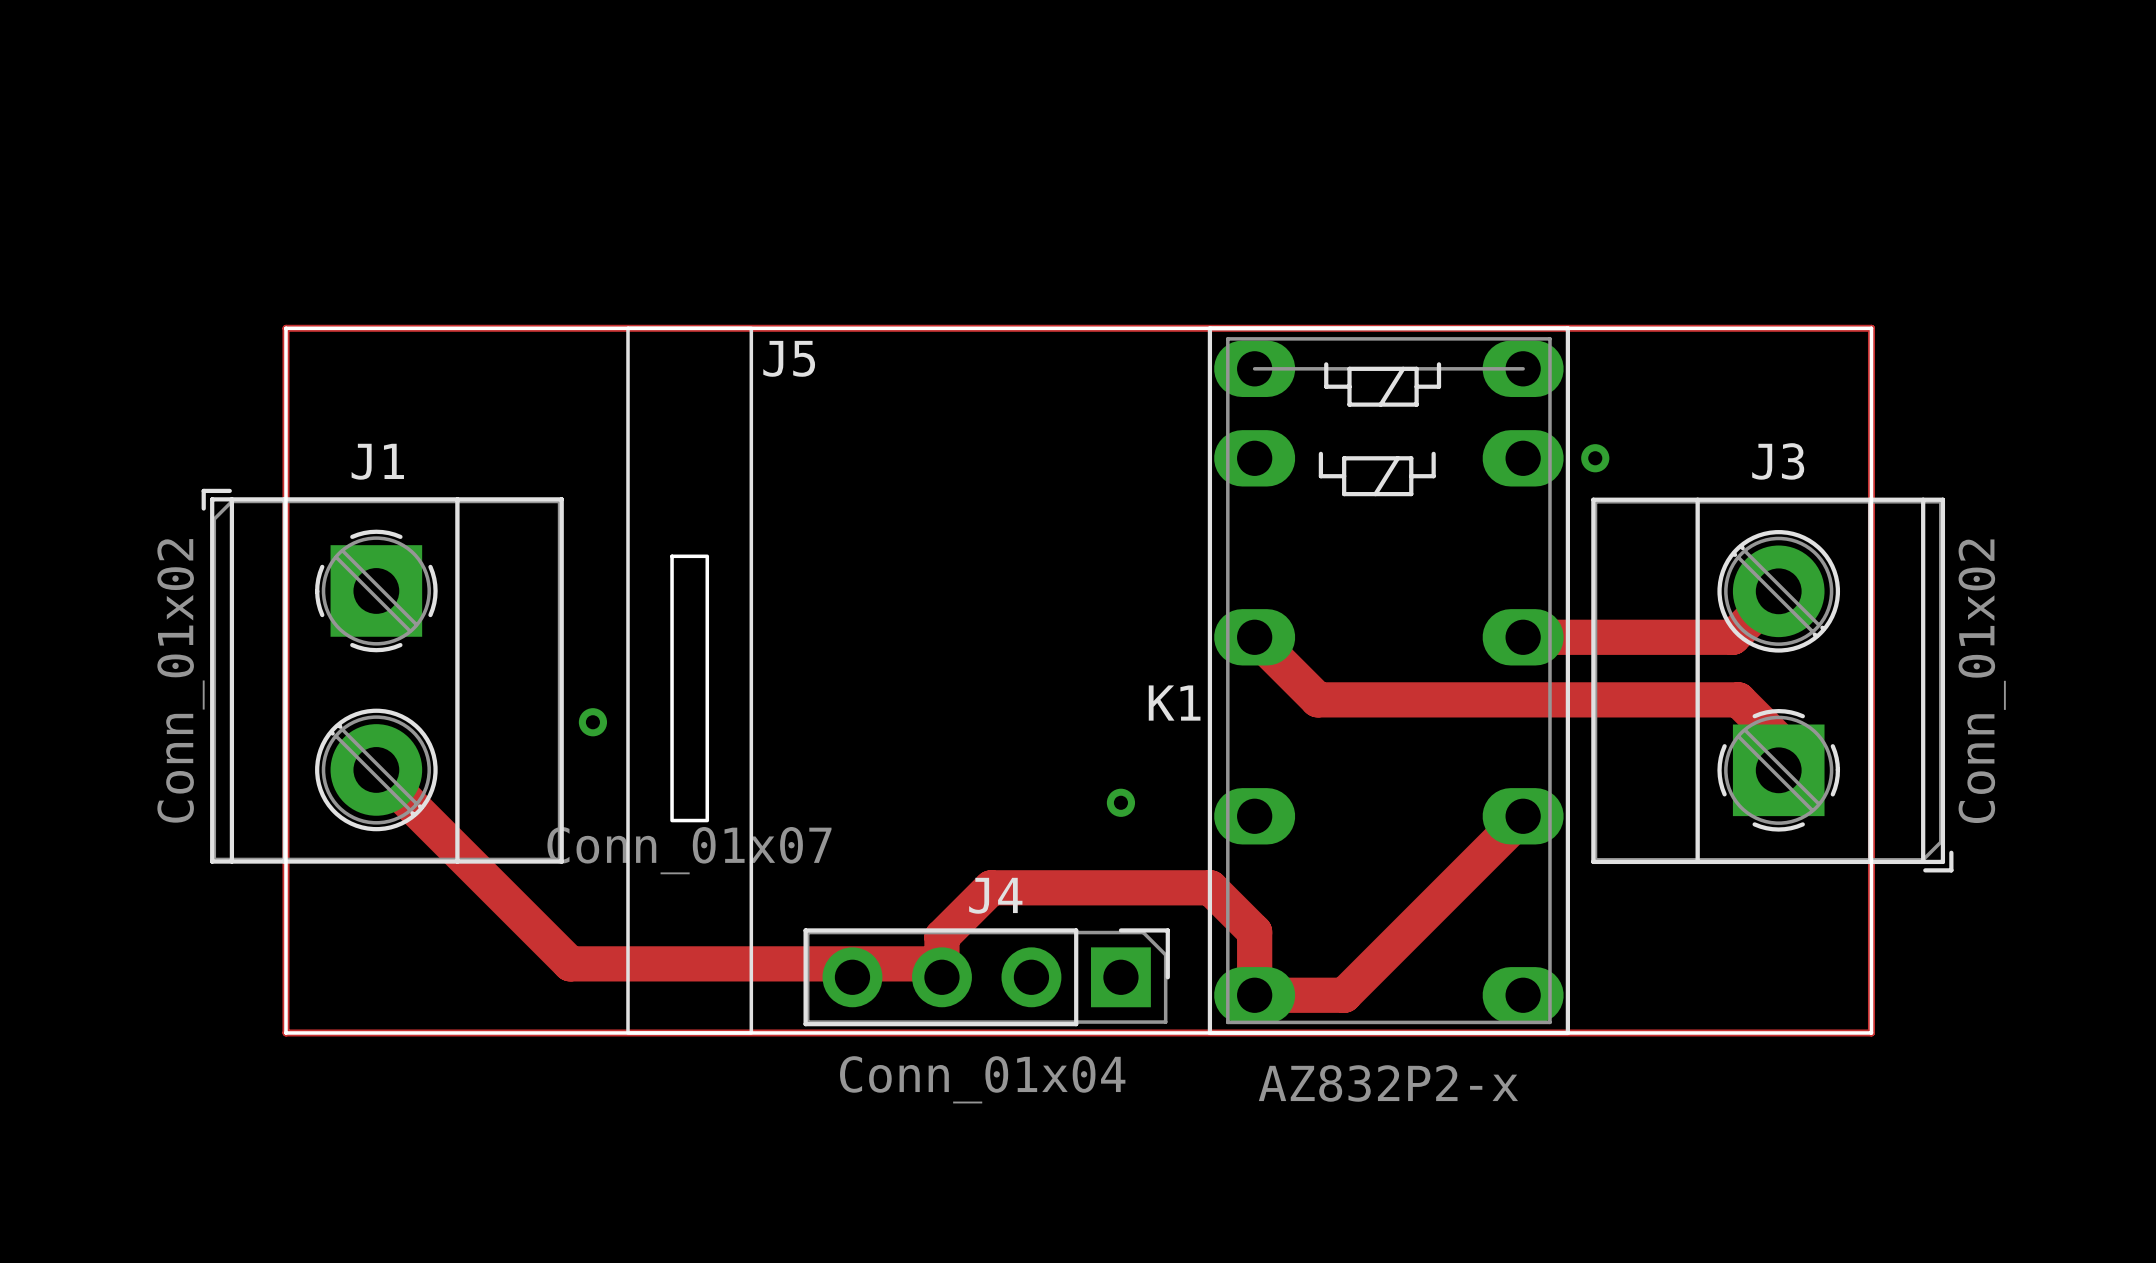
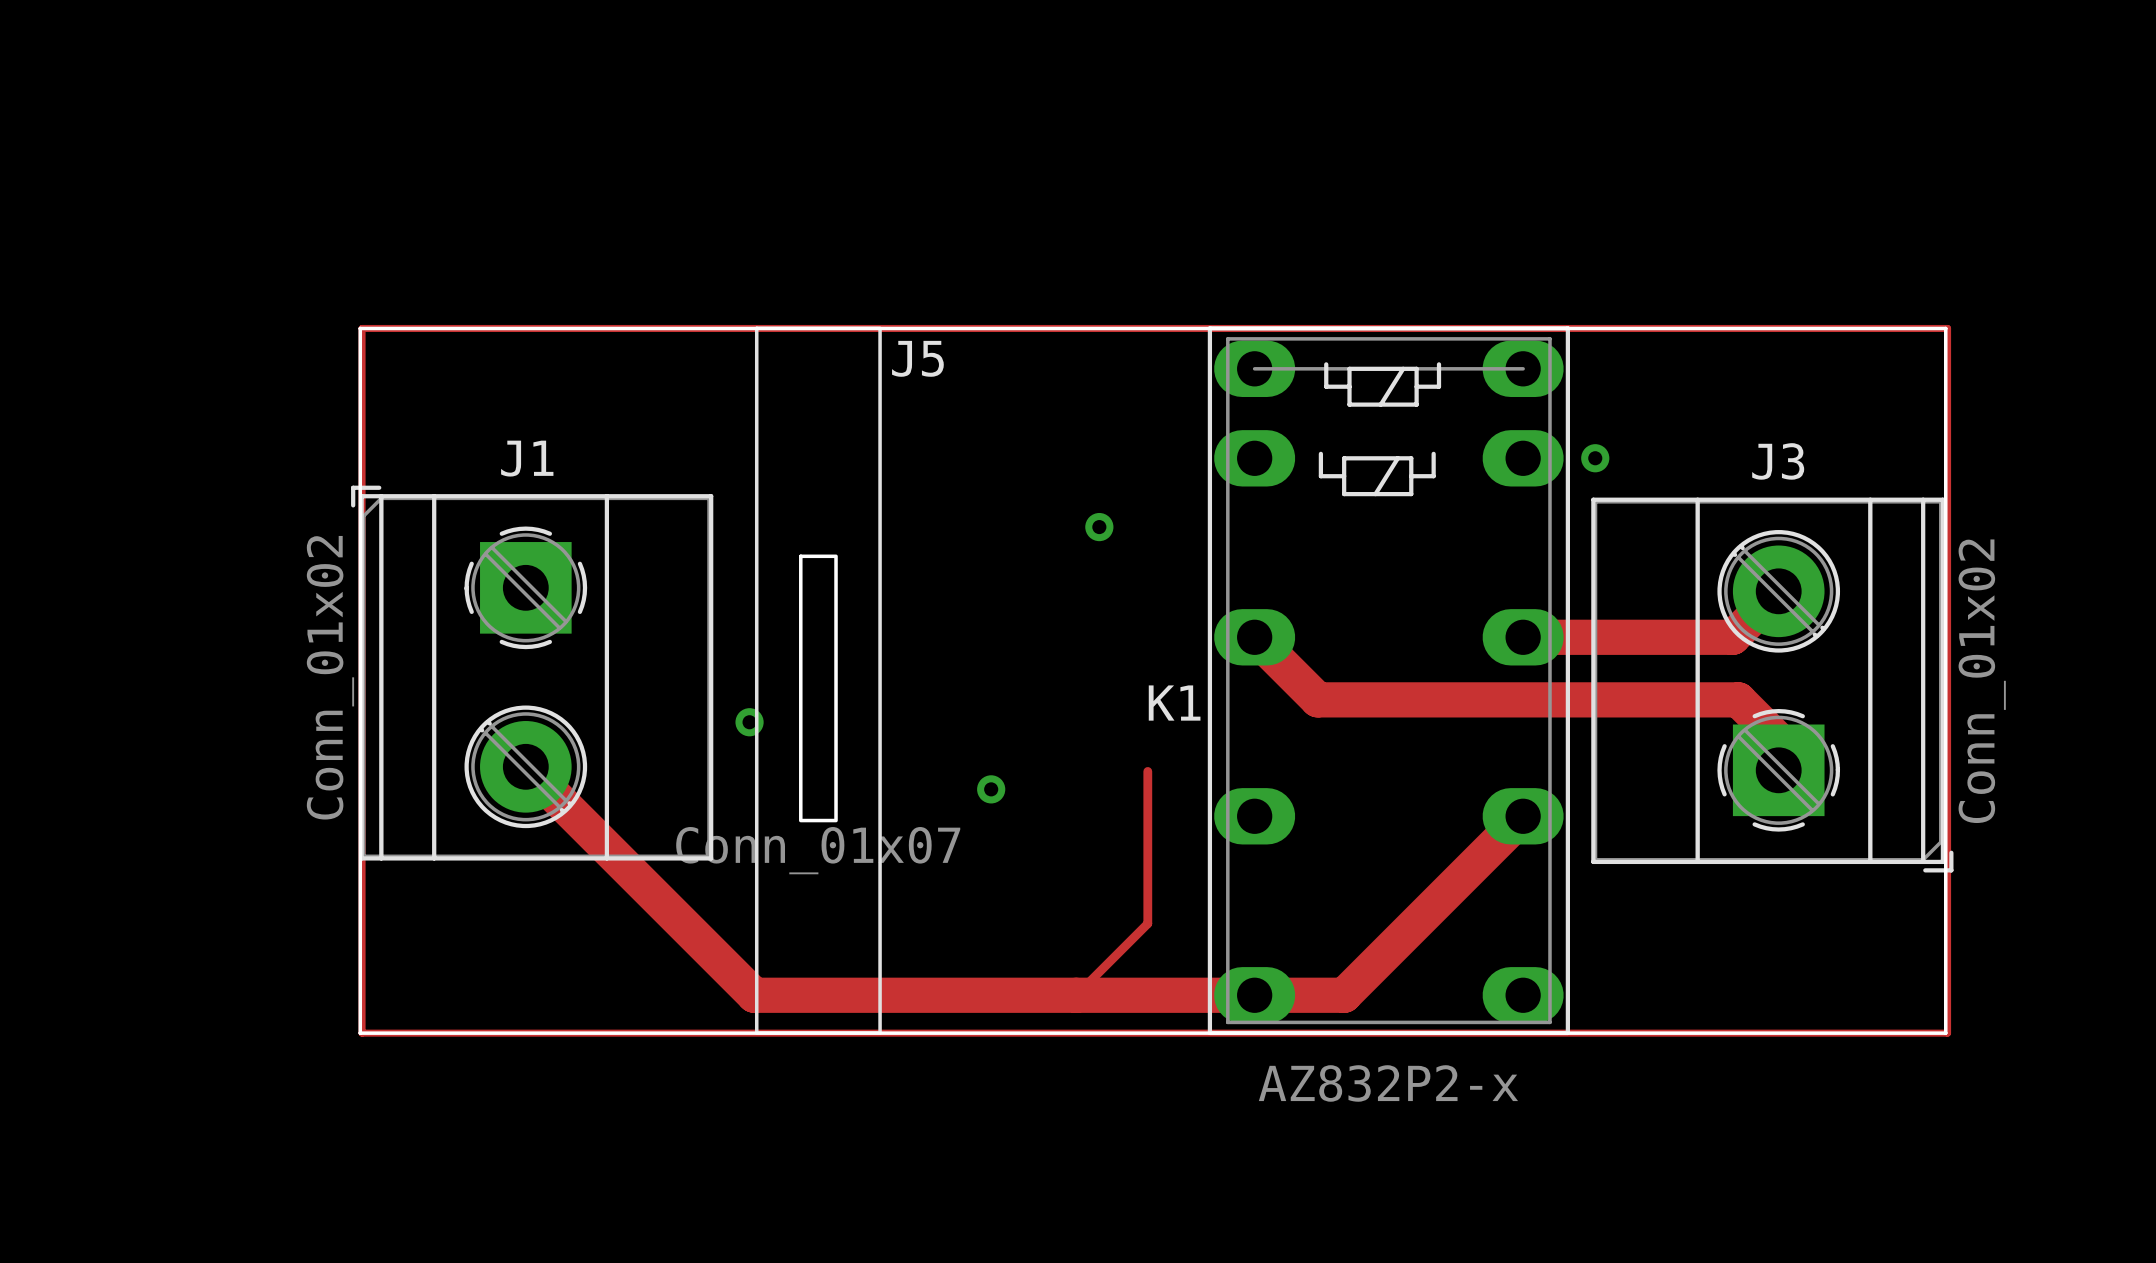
track: (285, 328) (285, 1032) (1871, 1032) (1871, 328) (285, 328) -> (362, 328) (362, 1033) (1947, 1033) (1947, 328) (362, 328)
board edge: (285, 328) (1871, 328) (1871, 1032) (285, 1032) (285, 328) -> (360, 328) (1945, 328) (1945, 1033) (360, 1033) (360, 328)
via: none -> (1099, 527)
J1 position: (382, 676) -> (532, 673)
J5 position: (689, 680) -> (818, 680)
via position: (592, 722) -> (749, 722)
track: (376, 769) (570, 963) (941, 963) (941, 937) (991, 887) (1210, 887) (1254, 932) (1254, 995) -> (525, 766) (754, 995) (1254, 995)
track: none -> (1147, 771) (1147, 923) (1076, 995)
via position: (1120, 802) -> (991, 789)
J4: Conn_01x04 (986, 977) -> none

